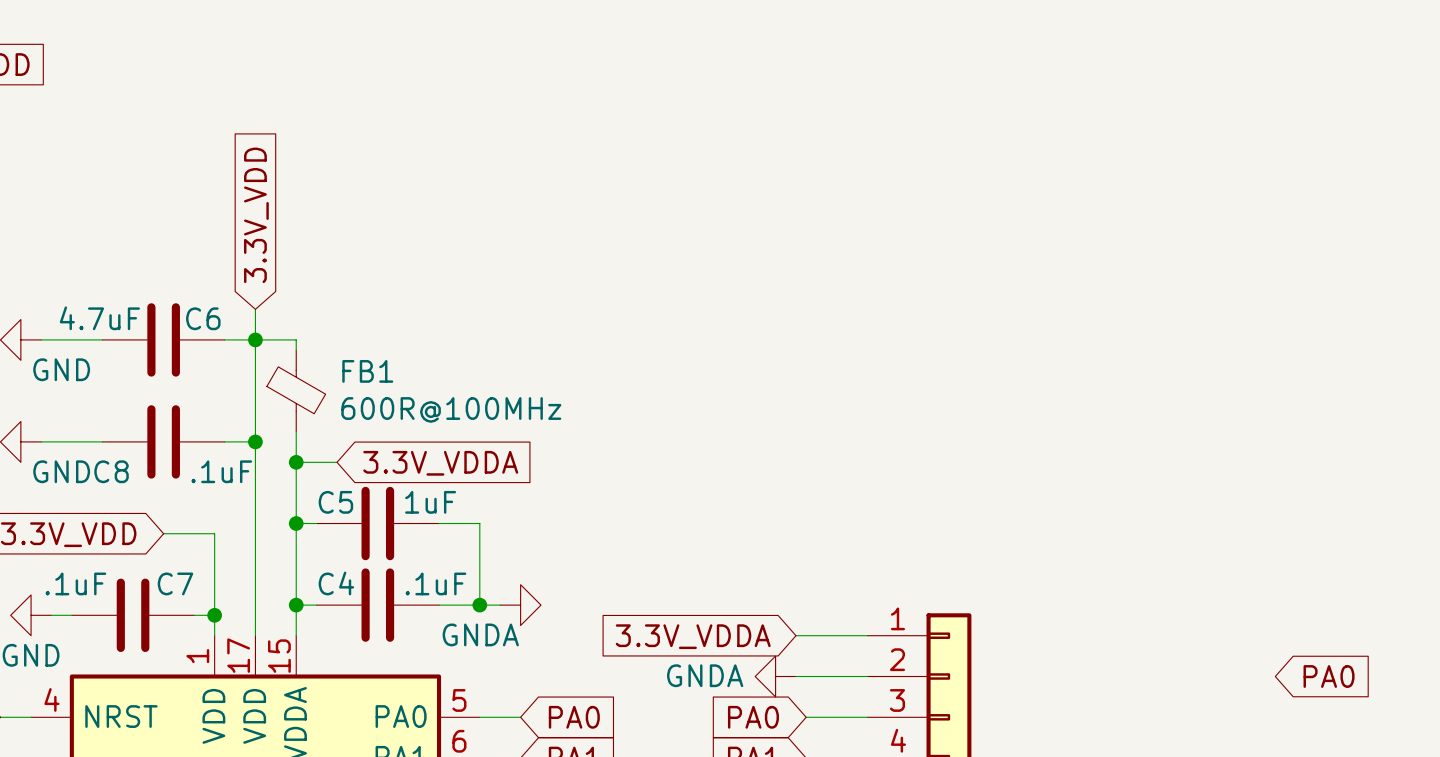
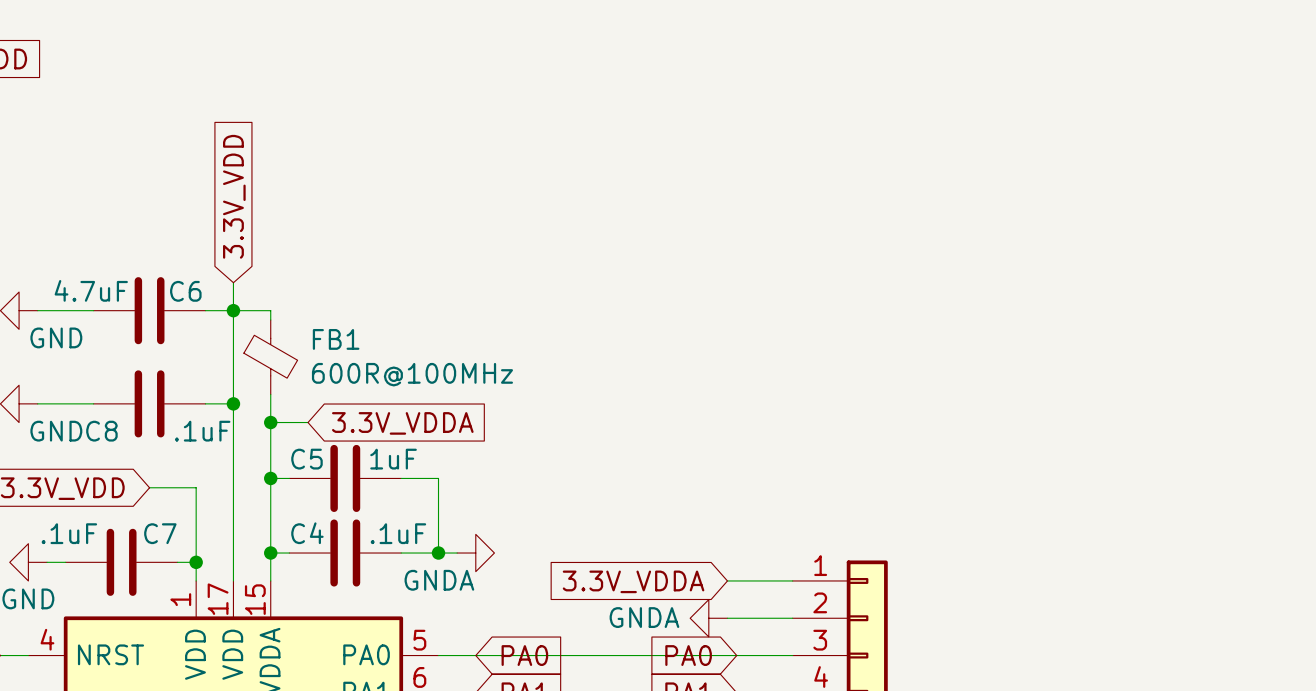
global label: PA0 (1329, 676) -> none
wire: none -> (475, 655) (736, 655)

